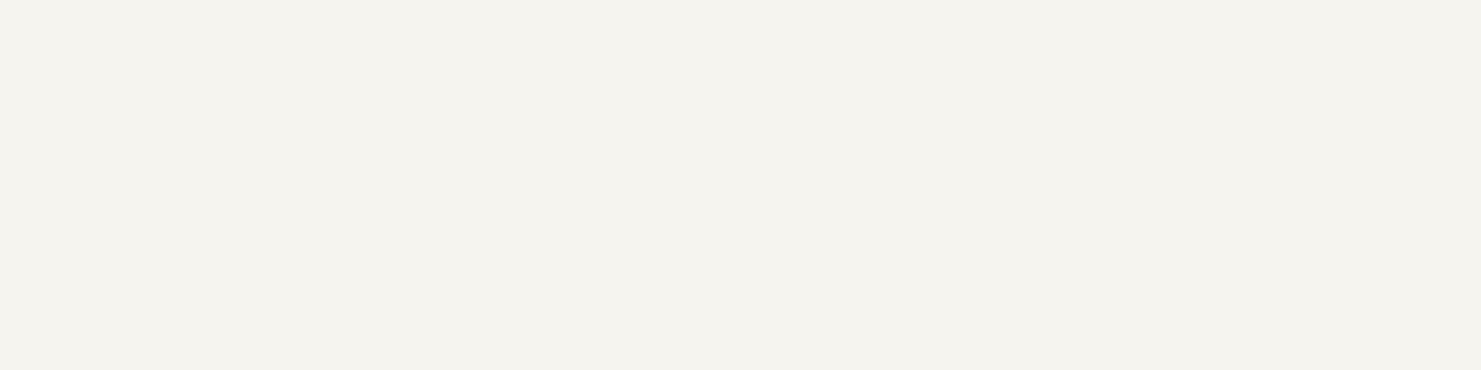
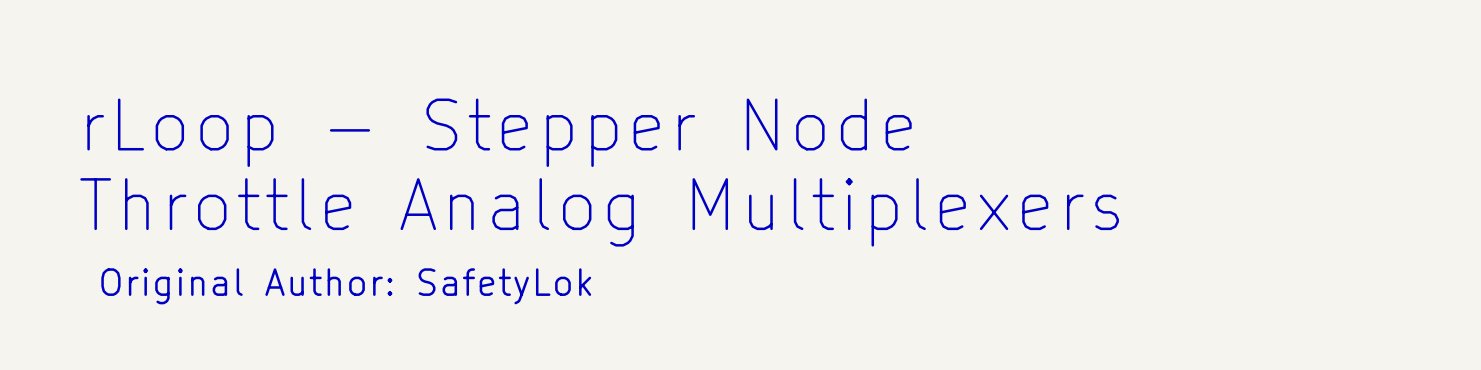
text: none -> rLoop - Stepper Node (499, 132)
text: none -> Throttle Analog Multiplexers (599, 212)
text: none -> Original Author: SafetyLok (346, 286)

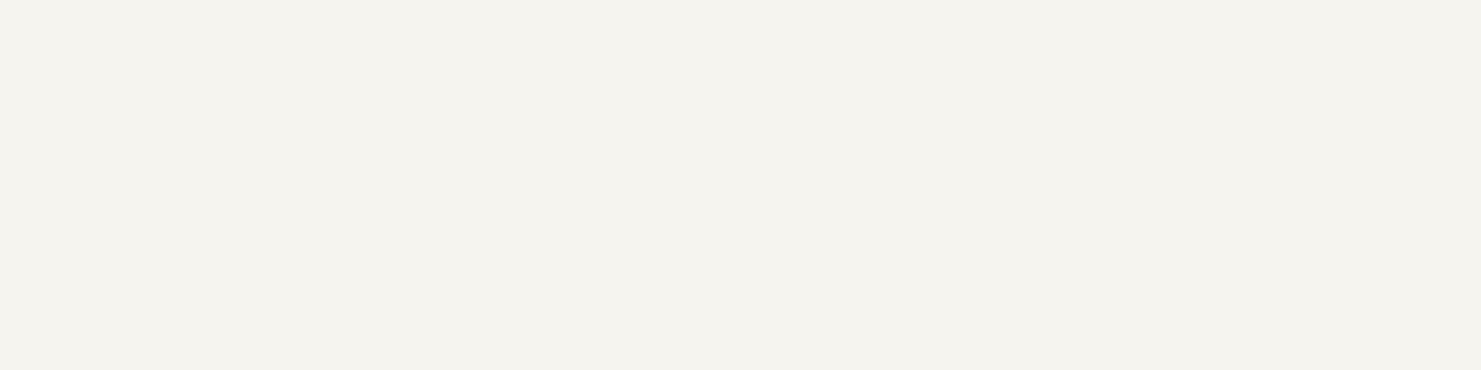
text: rLoop - Stepper Node (499, 132) -> none
text: Throttle Analog Multiplexers (599, 212) -> none
text: Original Author: SafetyLok (346, 286) -> none

